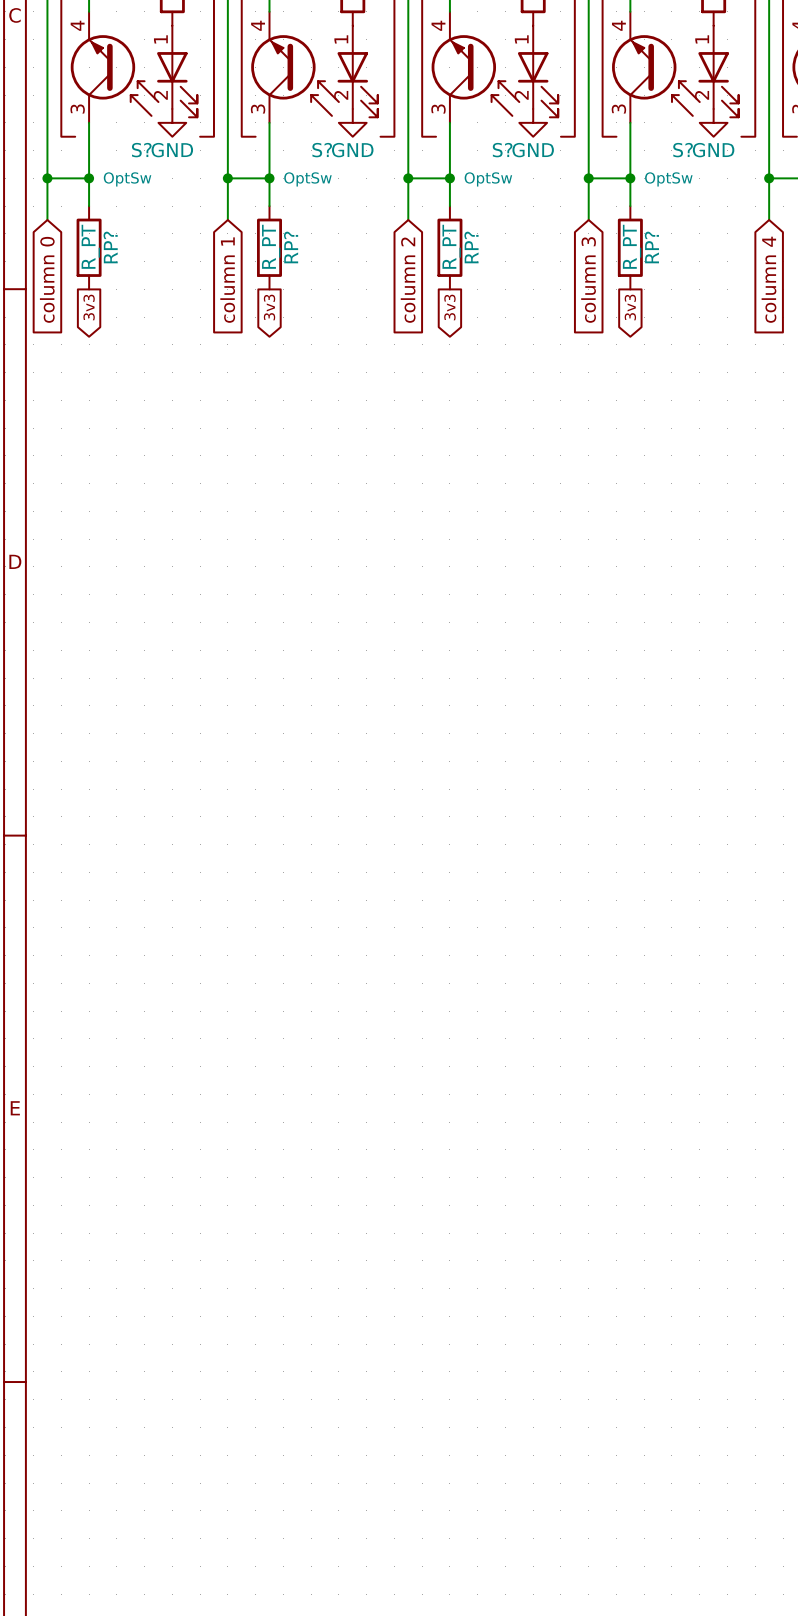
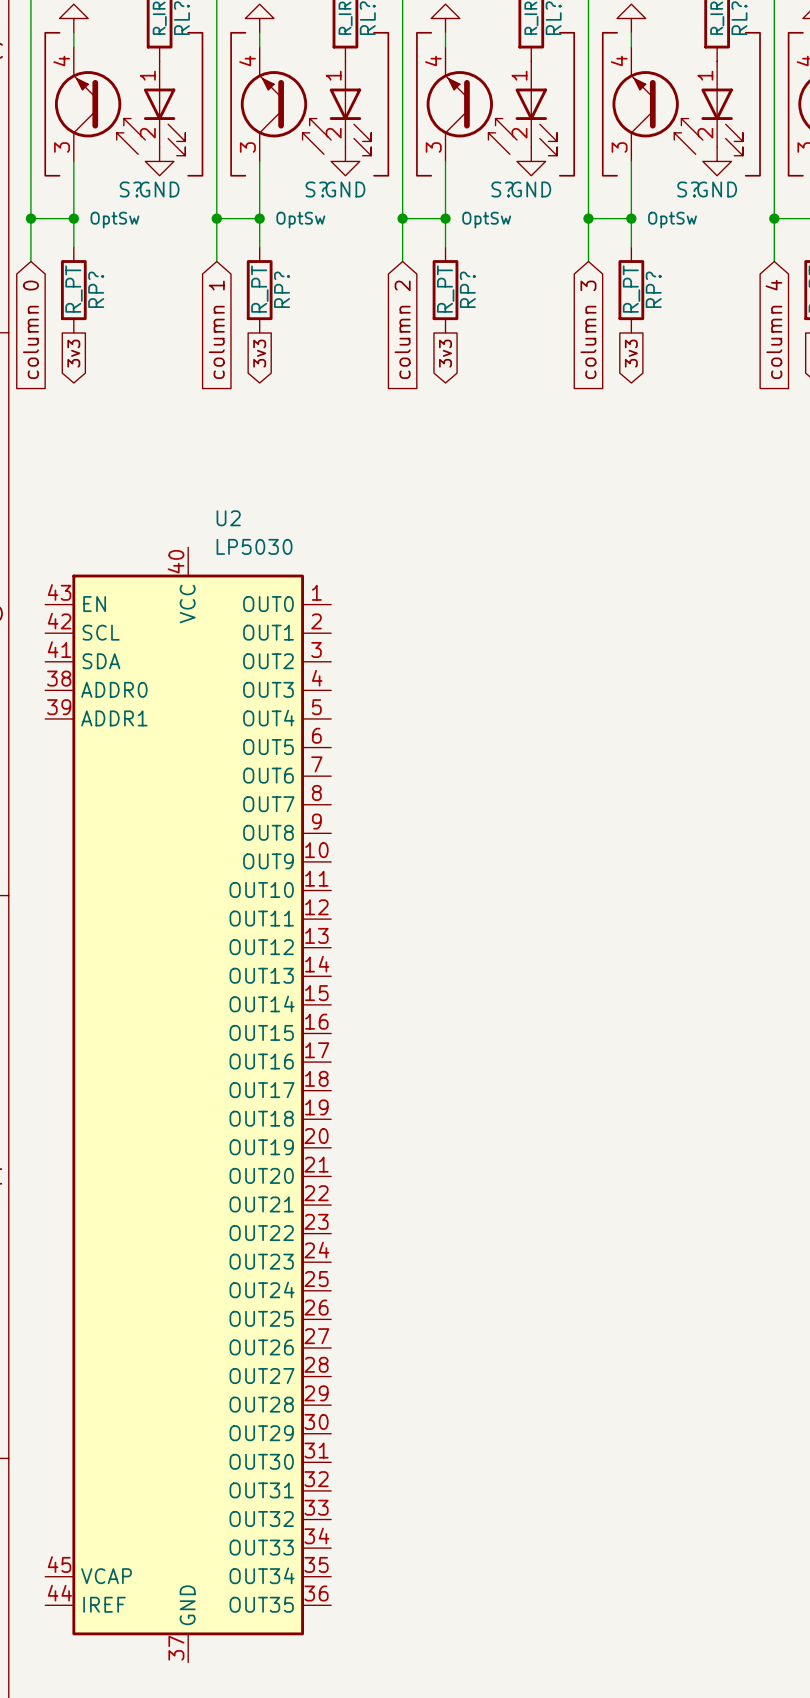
U2: none -> LP5030 (188, 1104)

